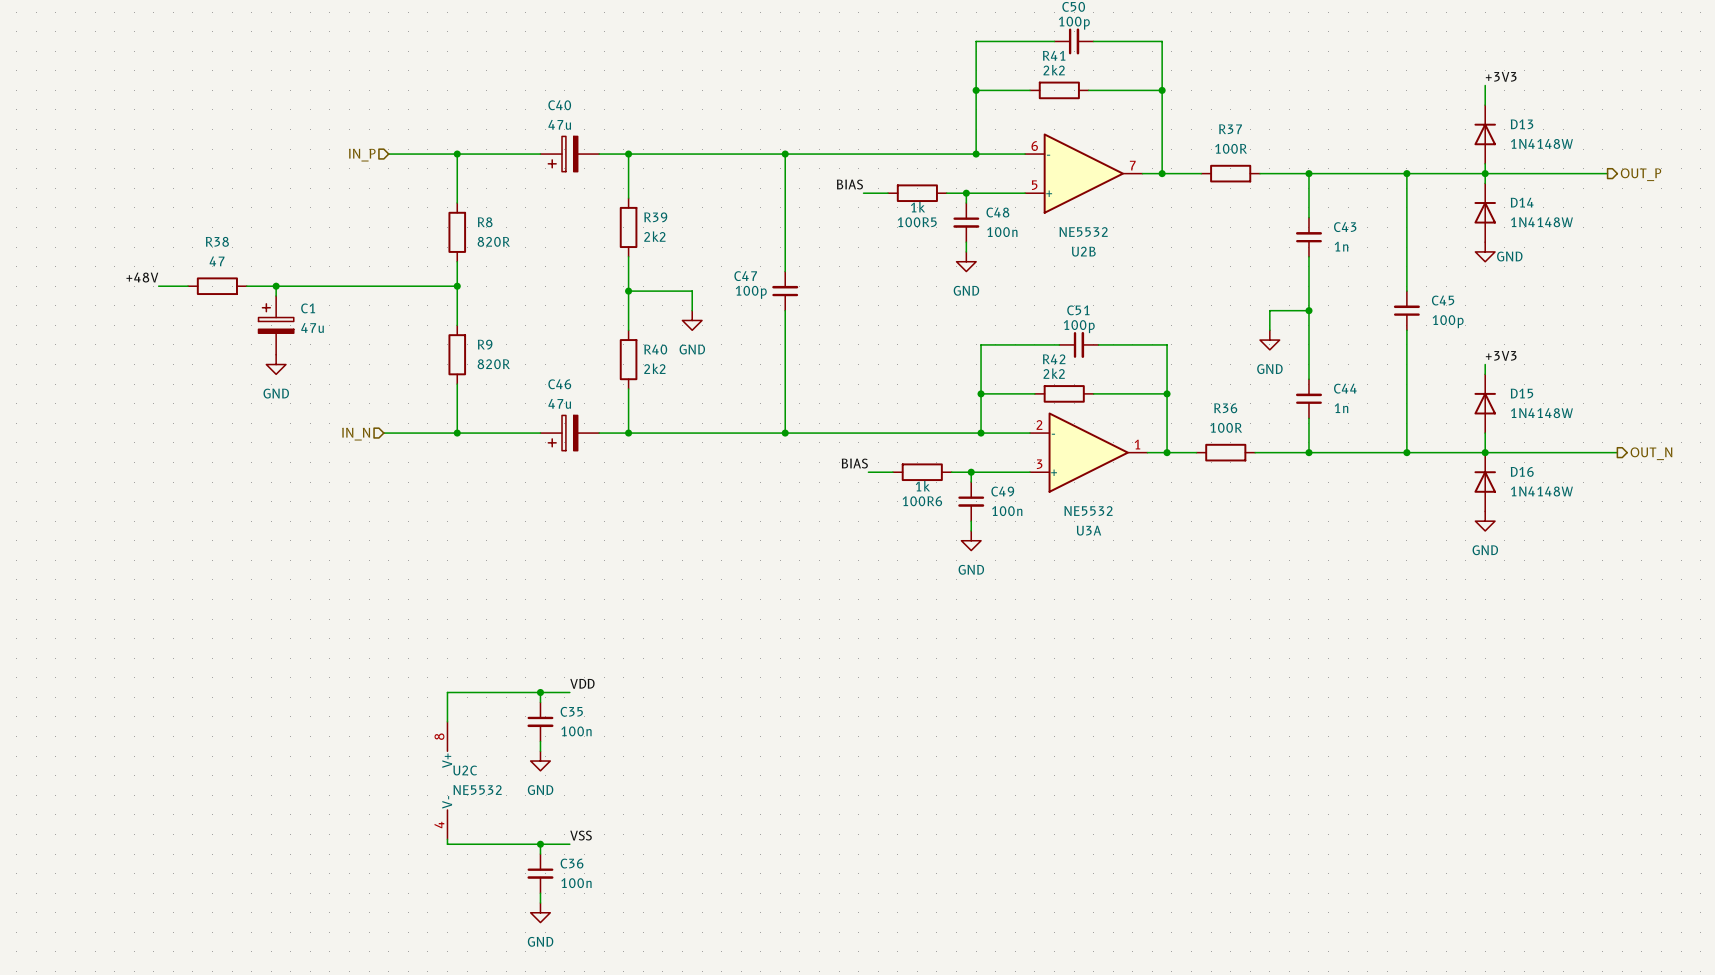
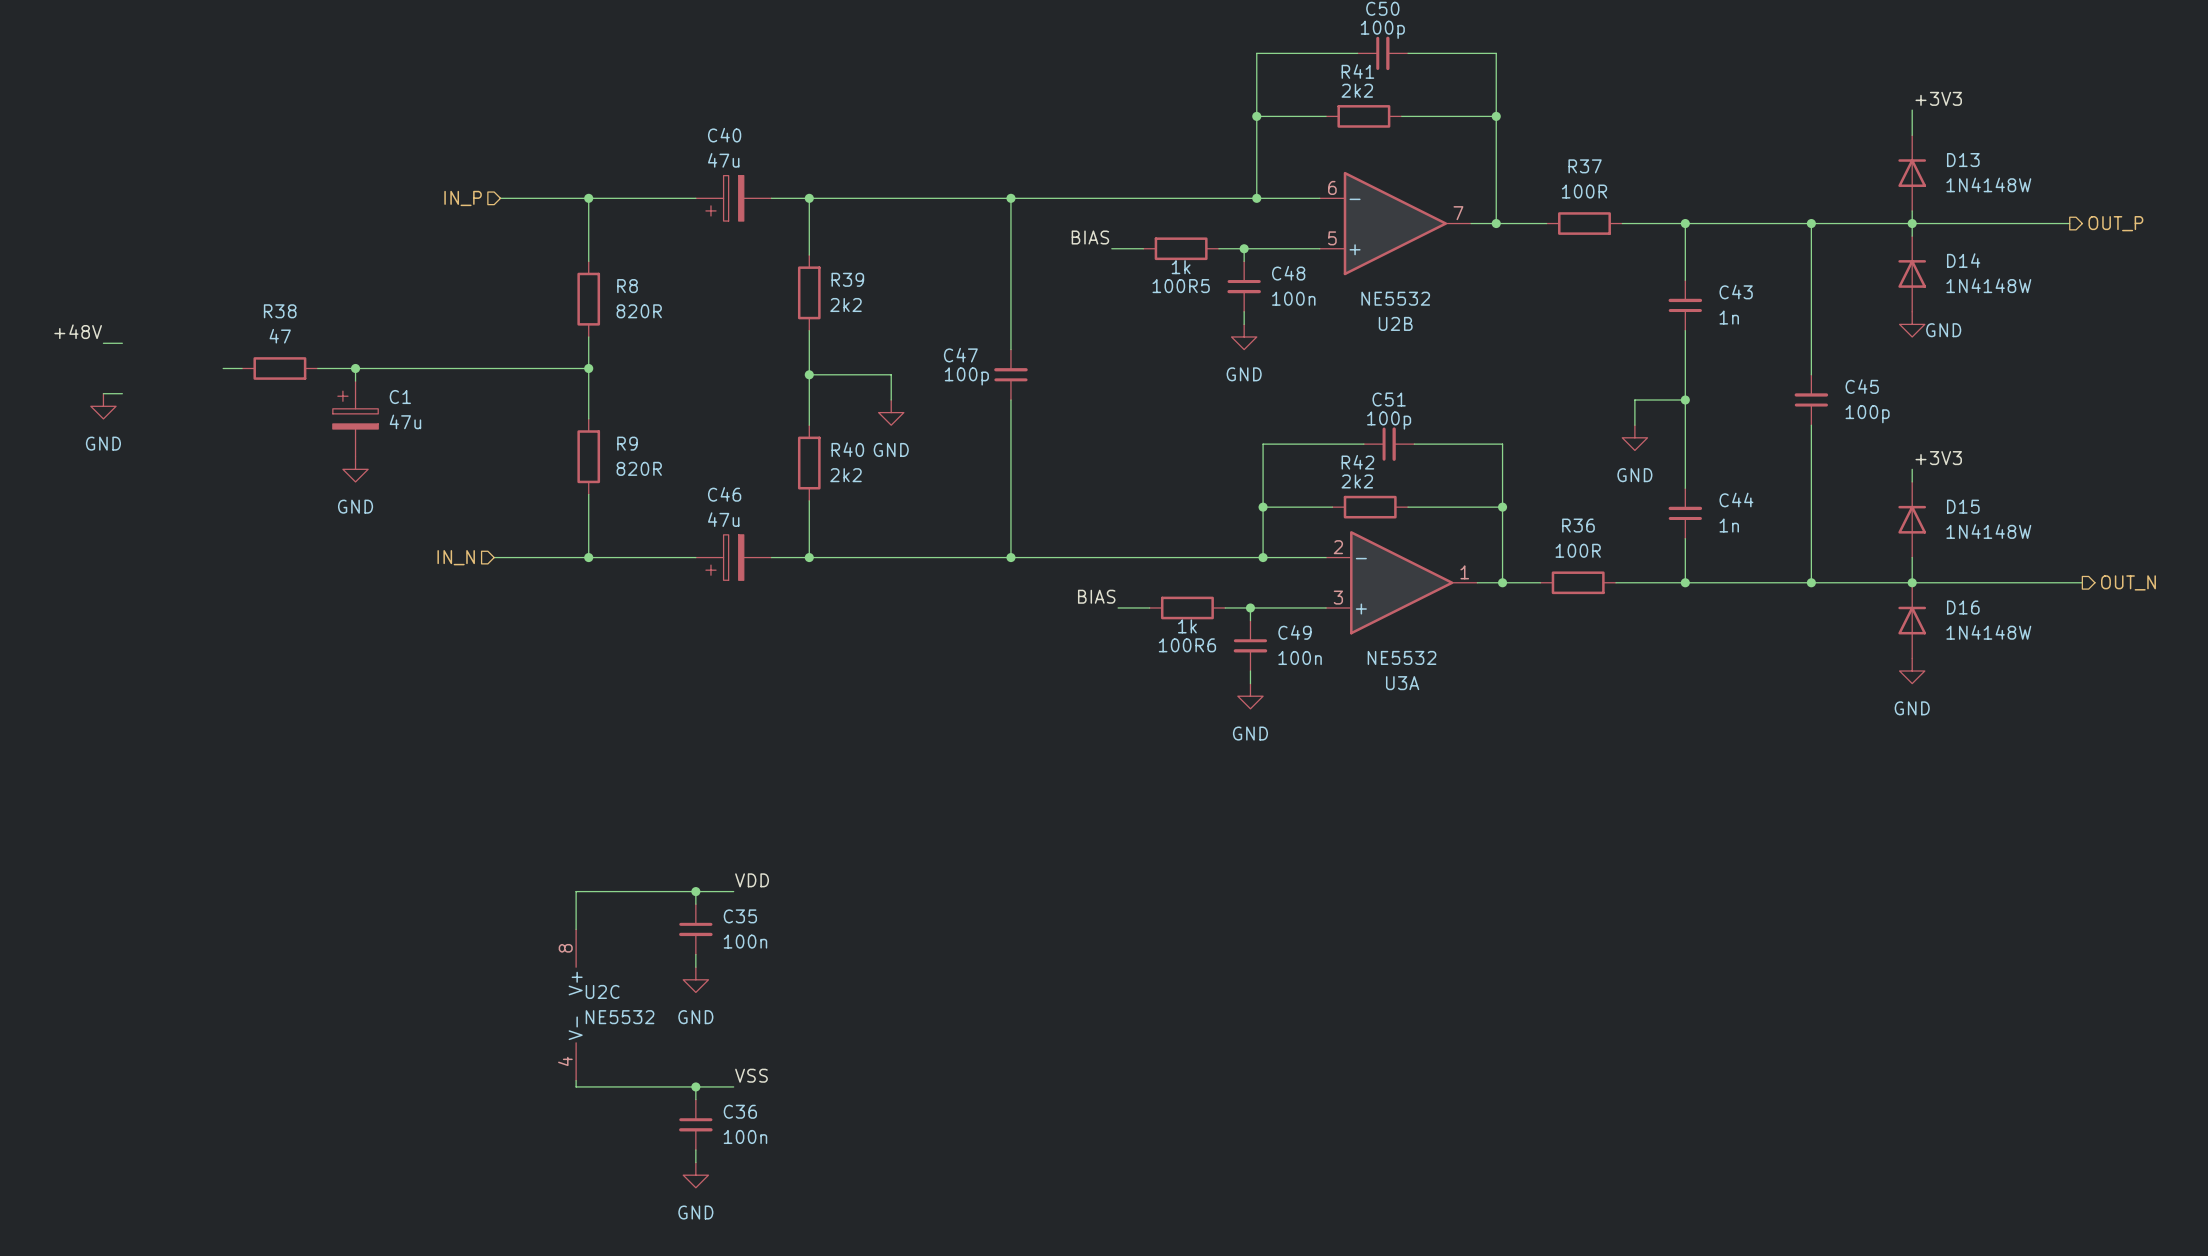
wire: none -> (103, 343) (122, 343)
label position: +48V (142, 277) -> +48V (78, 331)
wire: (158, 286) (173, 286) -> (103, 393) (122, 393)
power symbol: none -> GND (103, 406)

